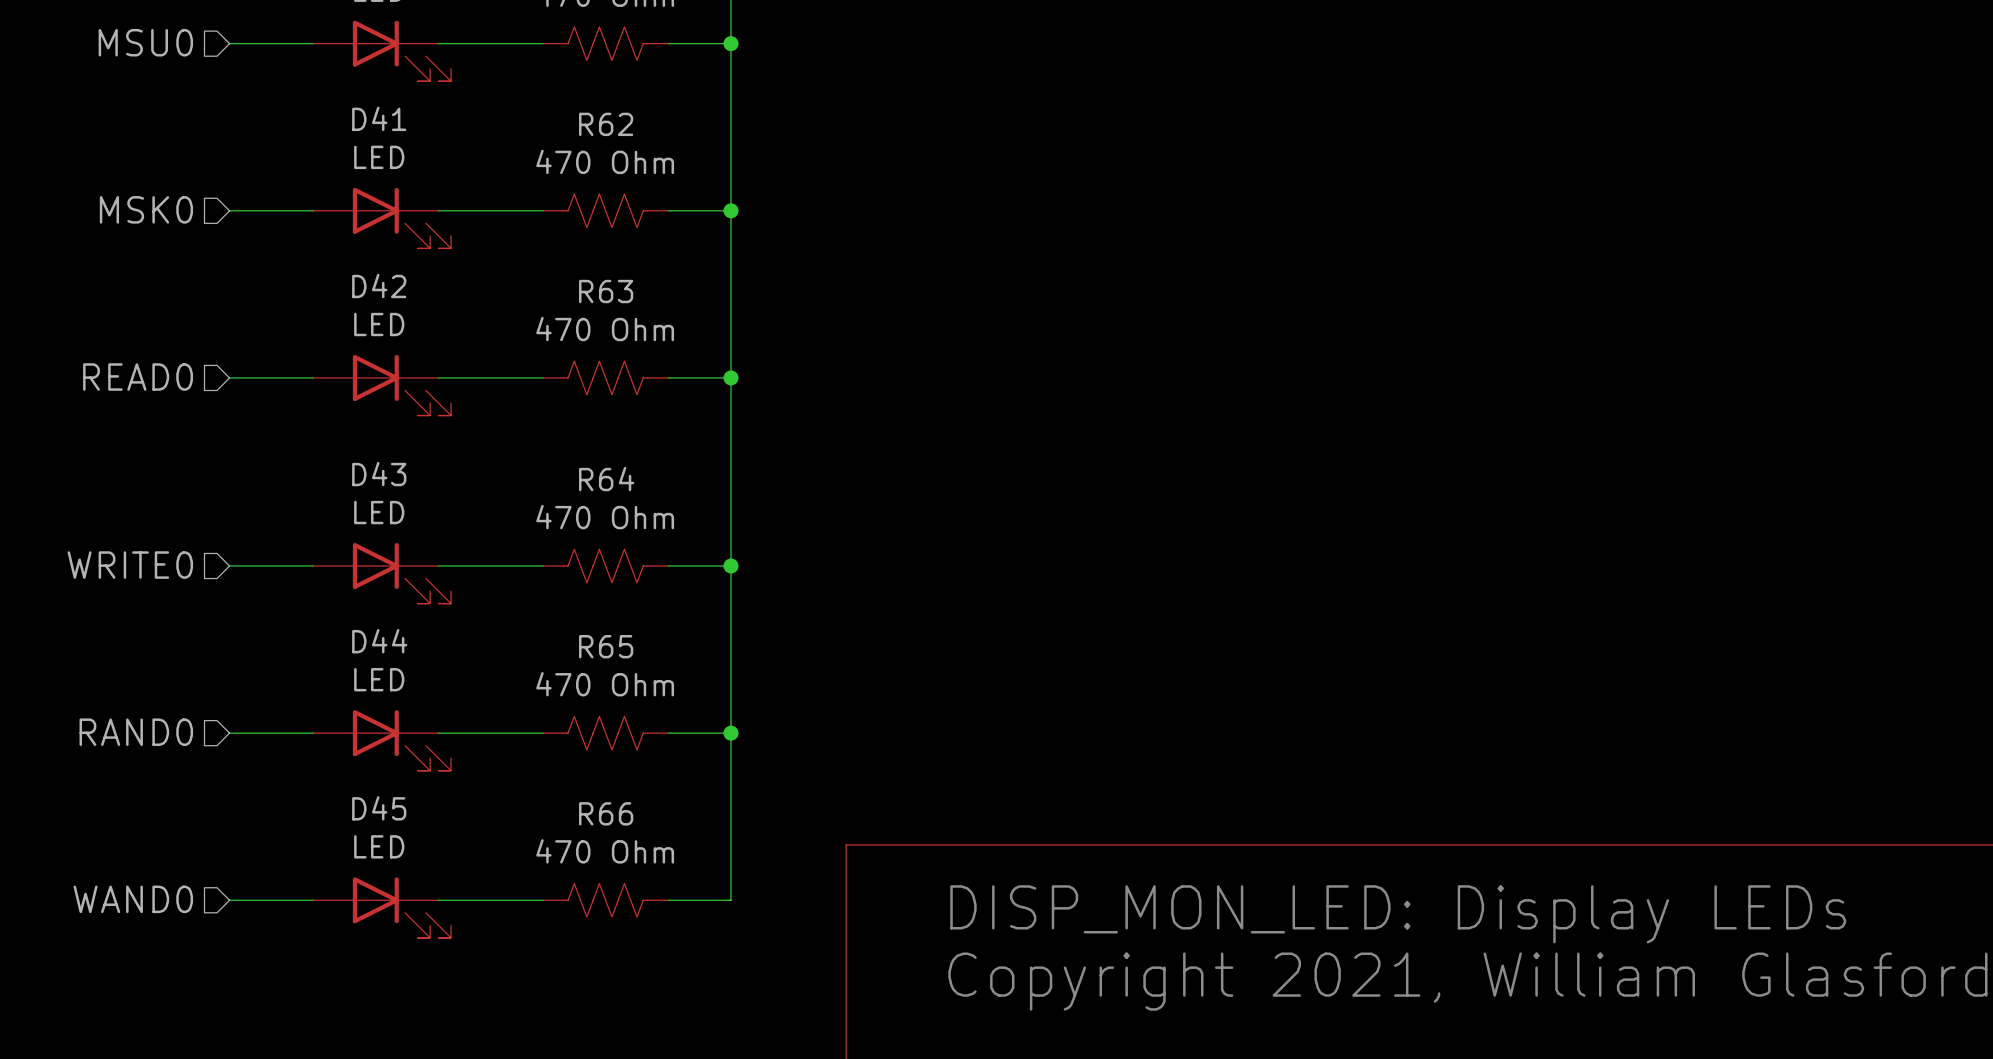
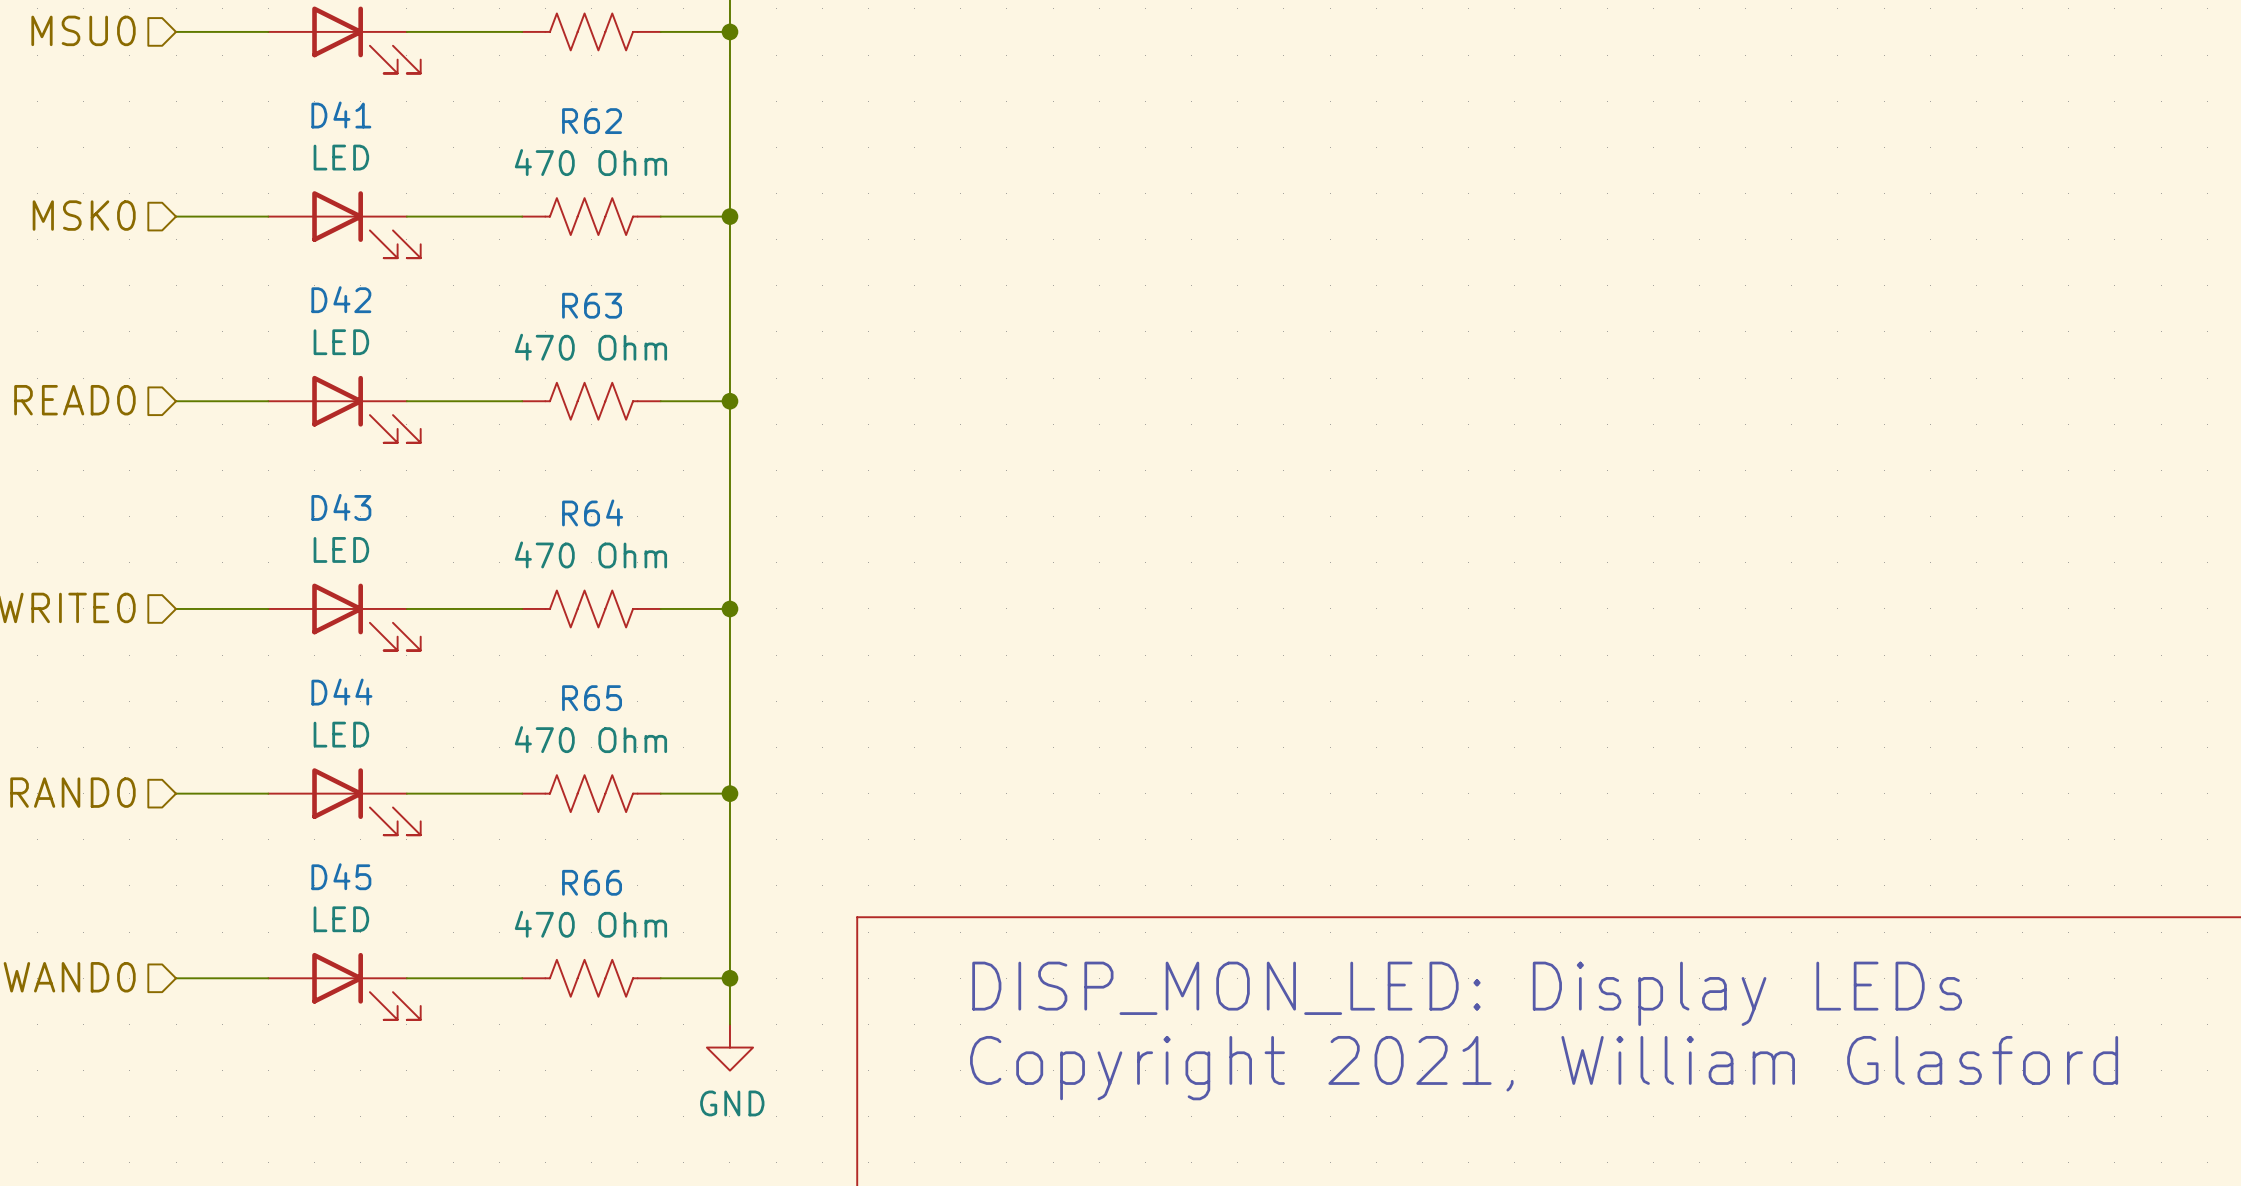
wire: none -> (729, 978) (729, 1024)
junction: none -> (729, 978)
power symbol: none -> GND (729, 1047)

